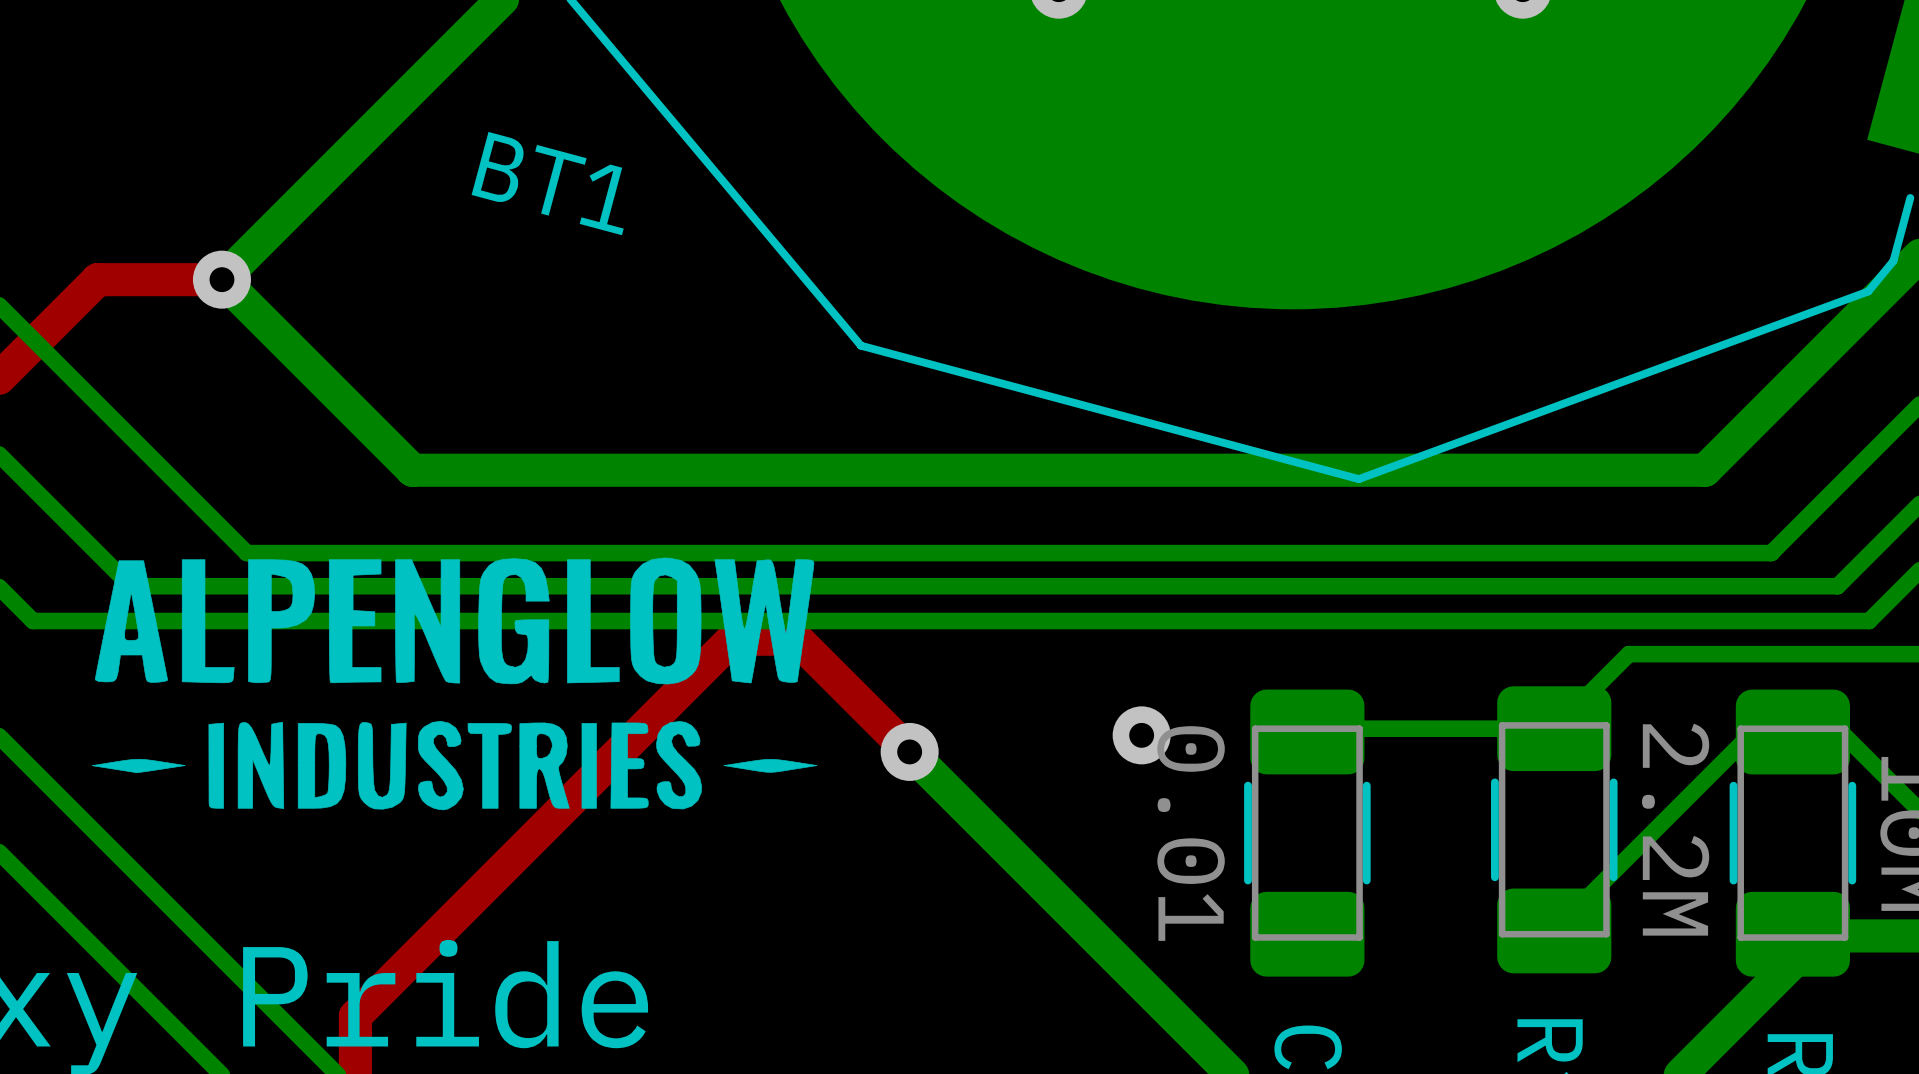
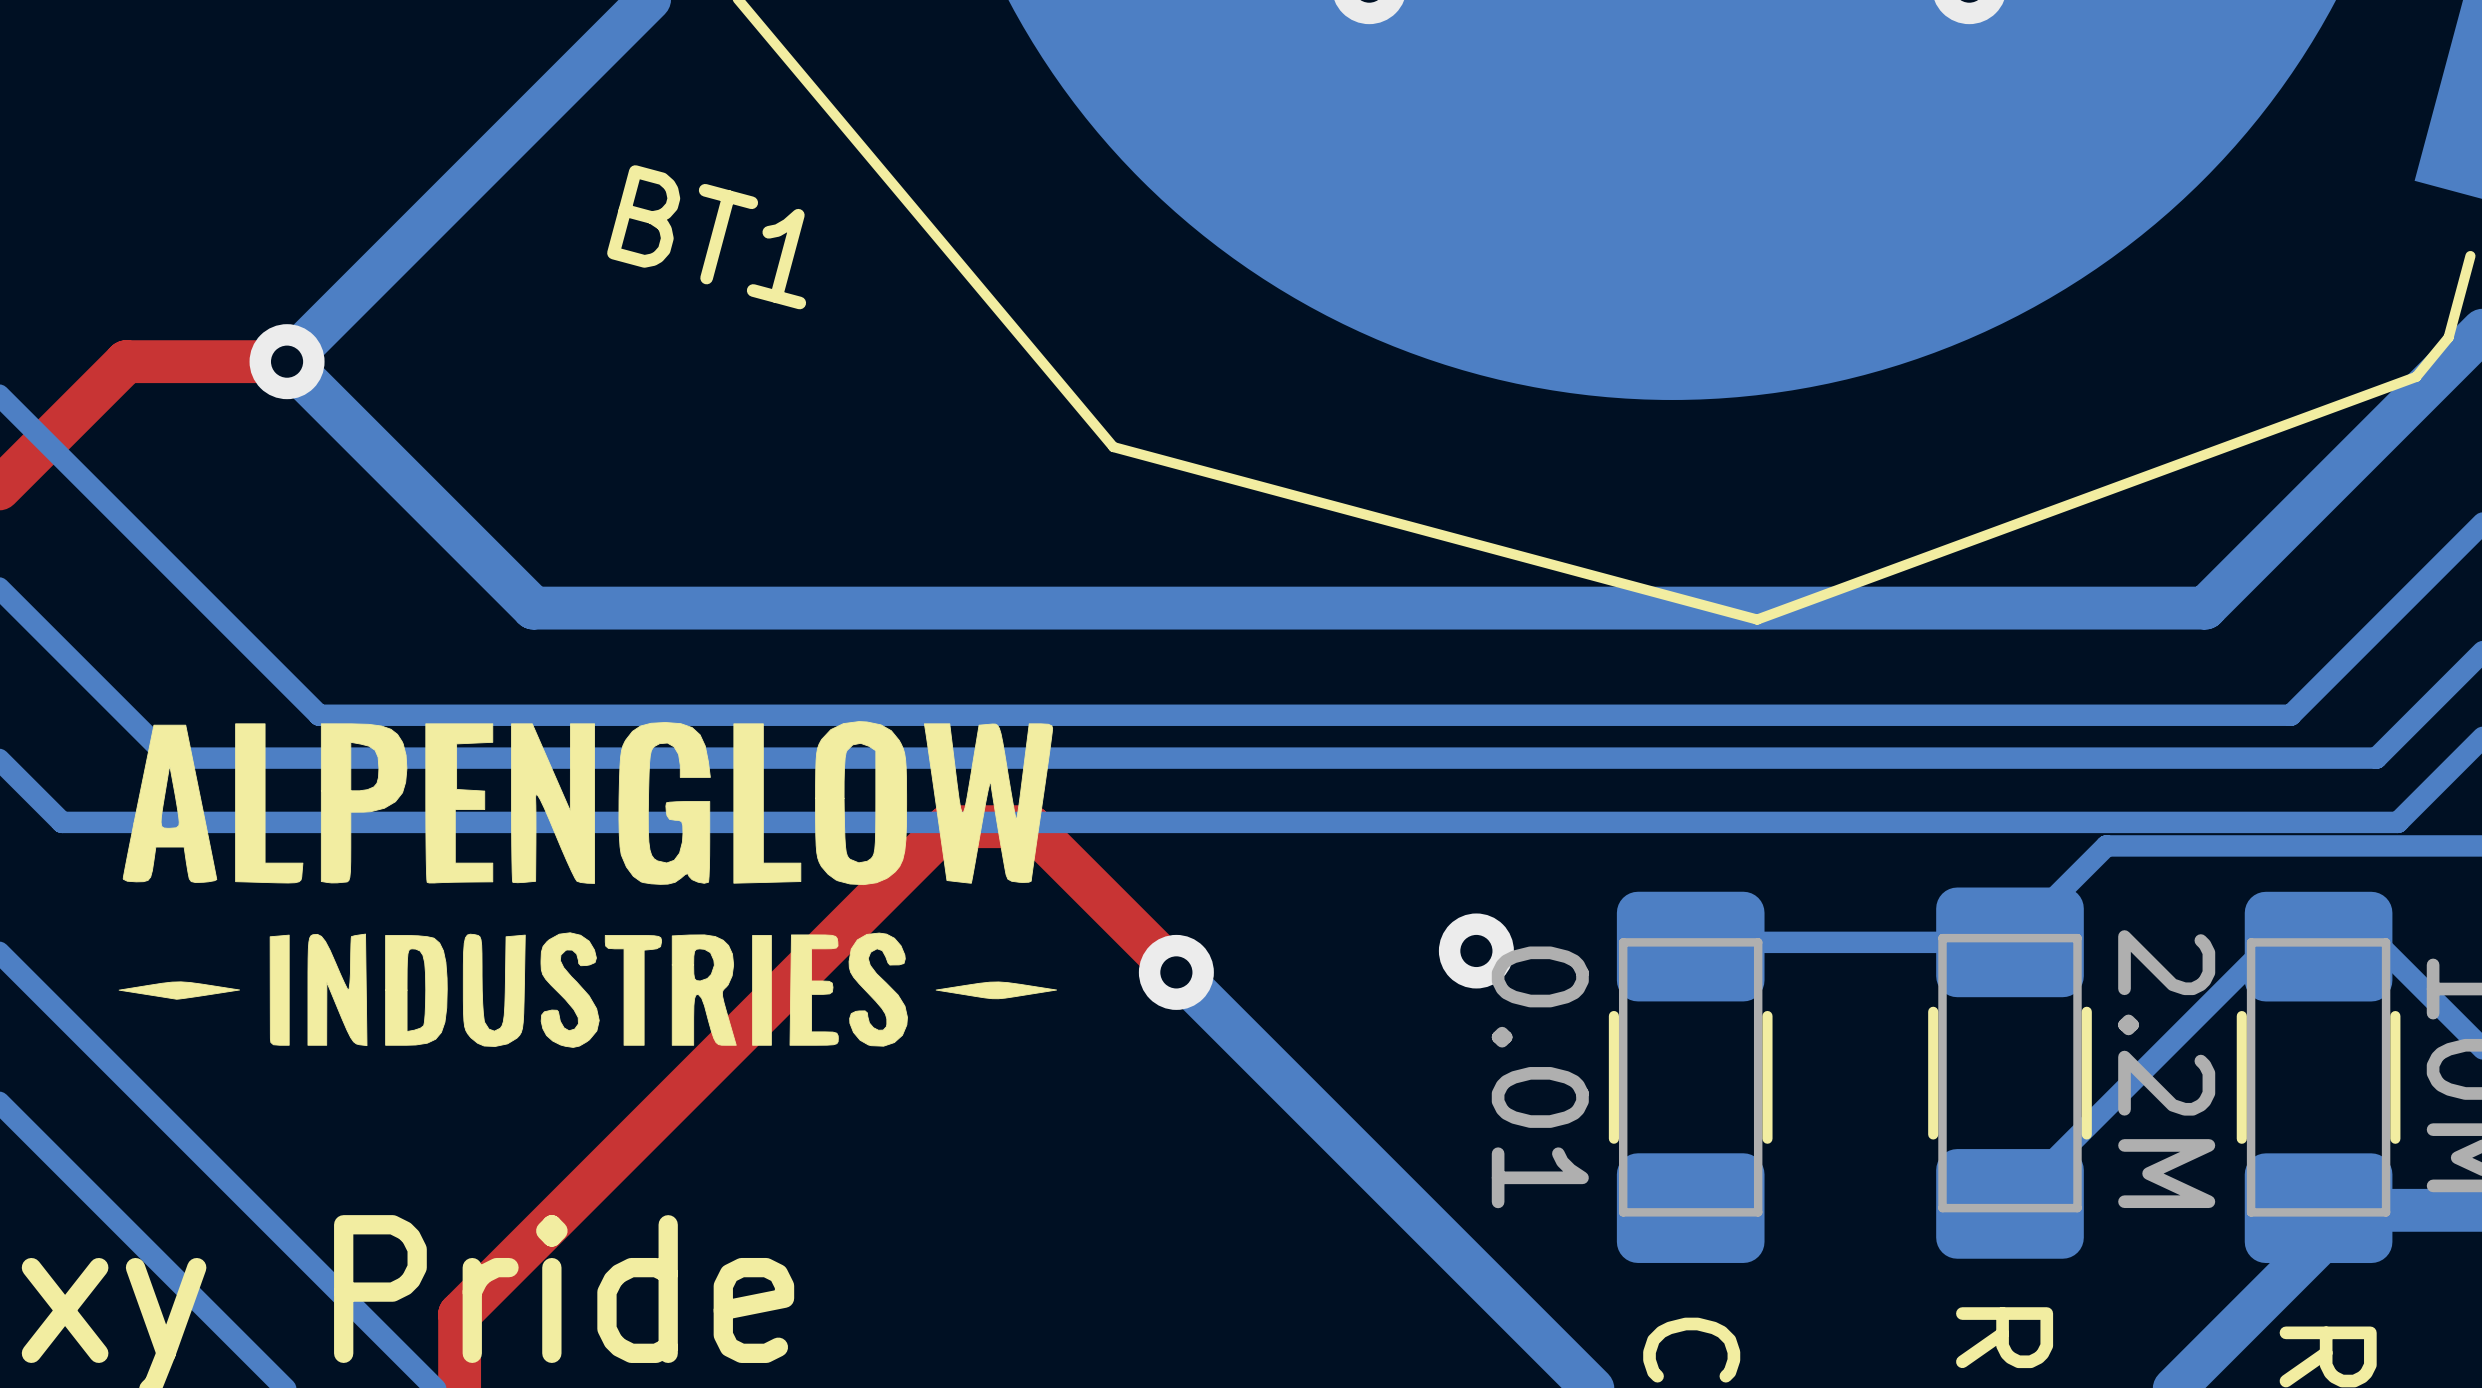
bottom track: (1869, 621) (33, 621) -> (2417, 803) (2397, 822) (62, 822) (42, 803)

